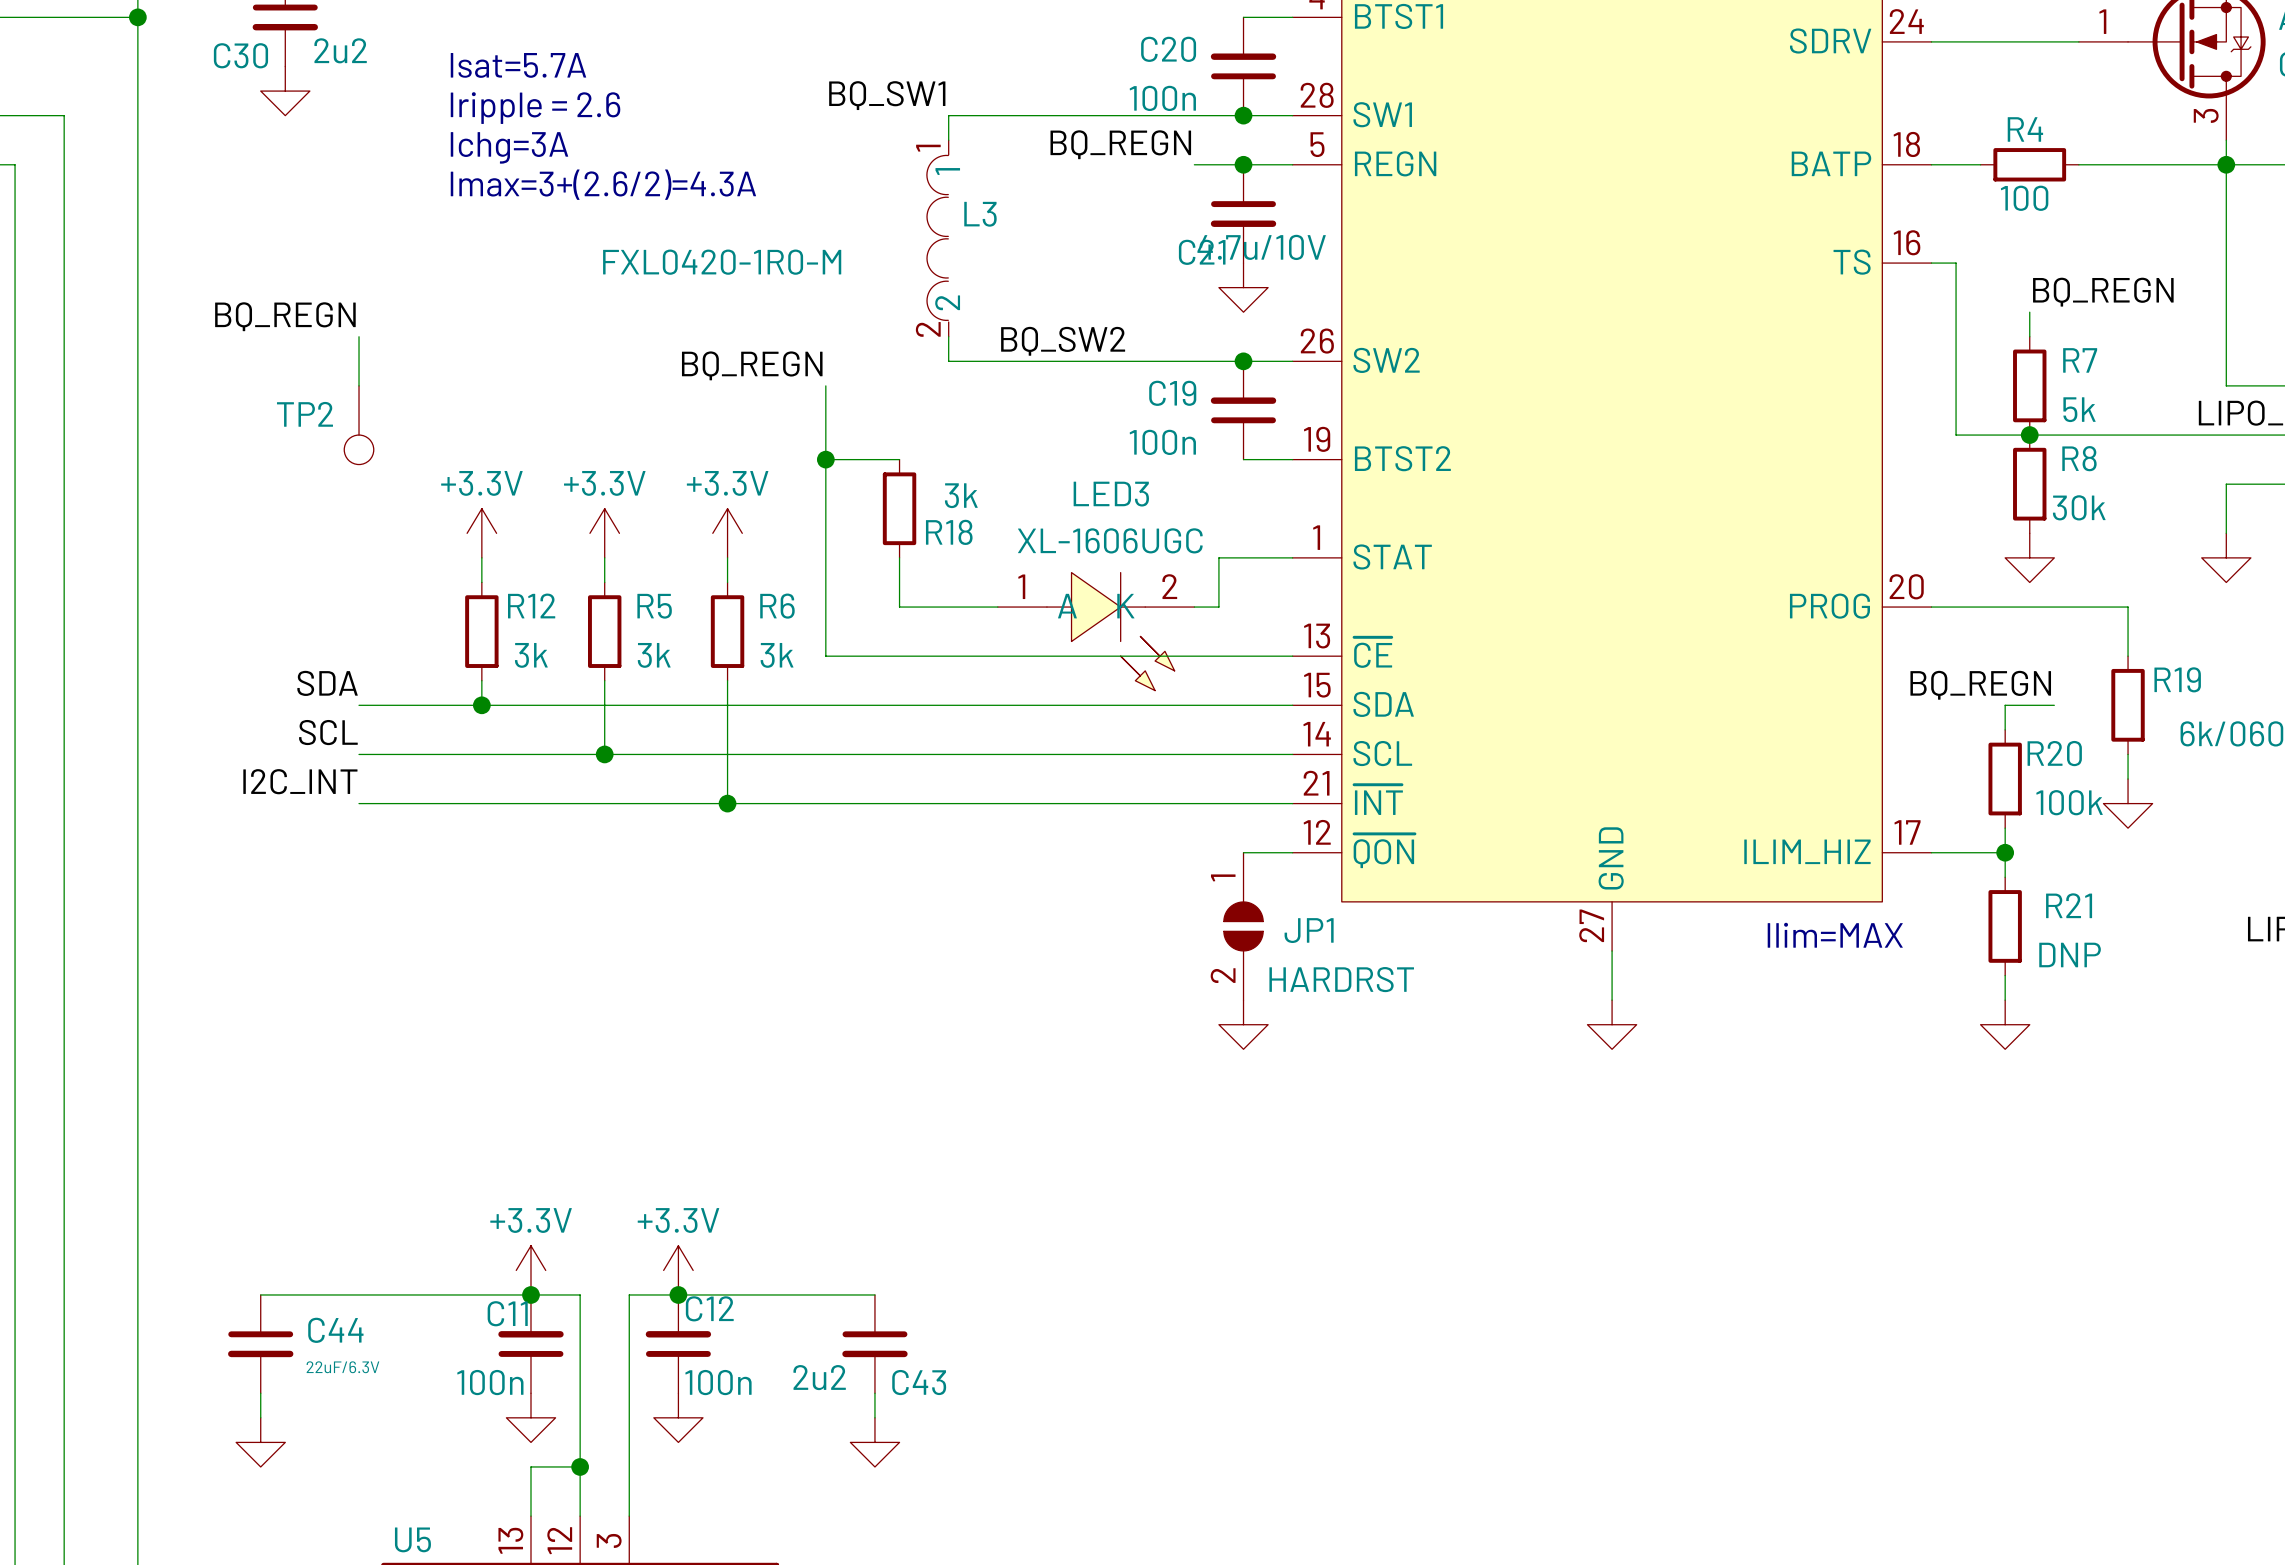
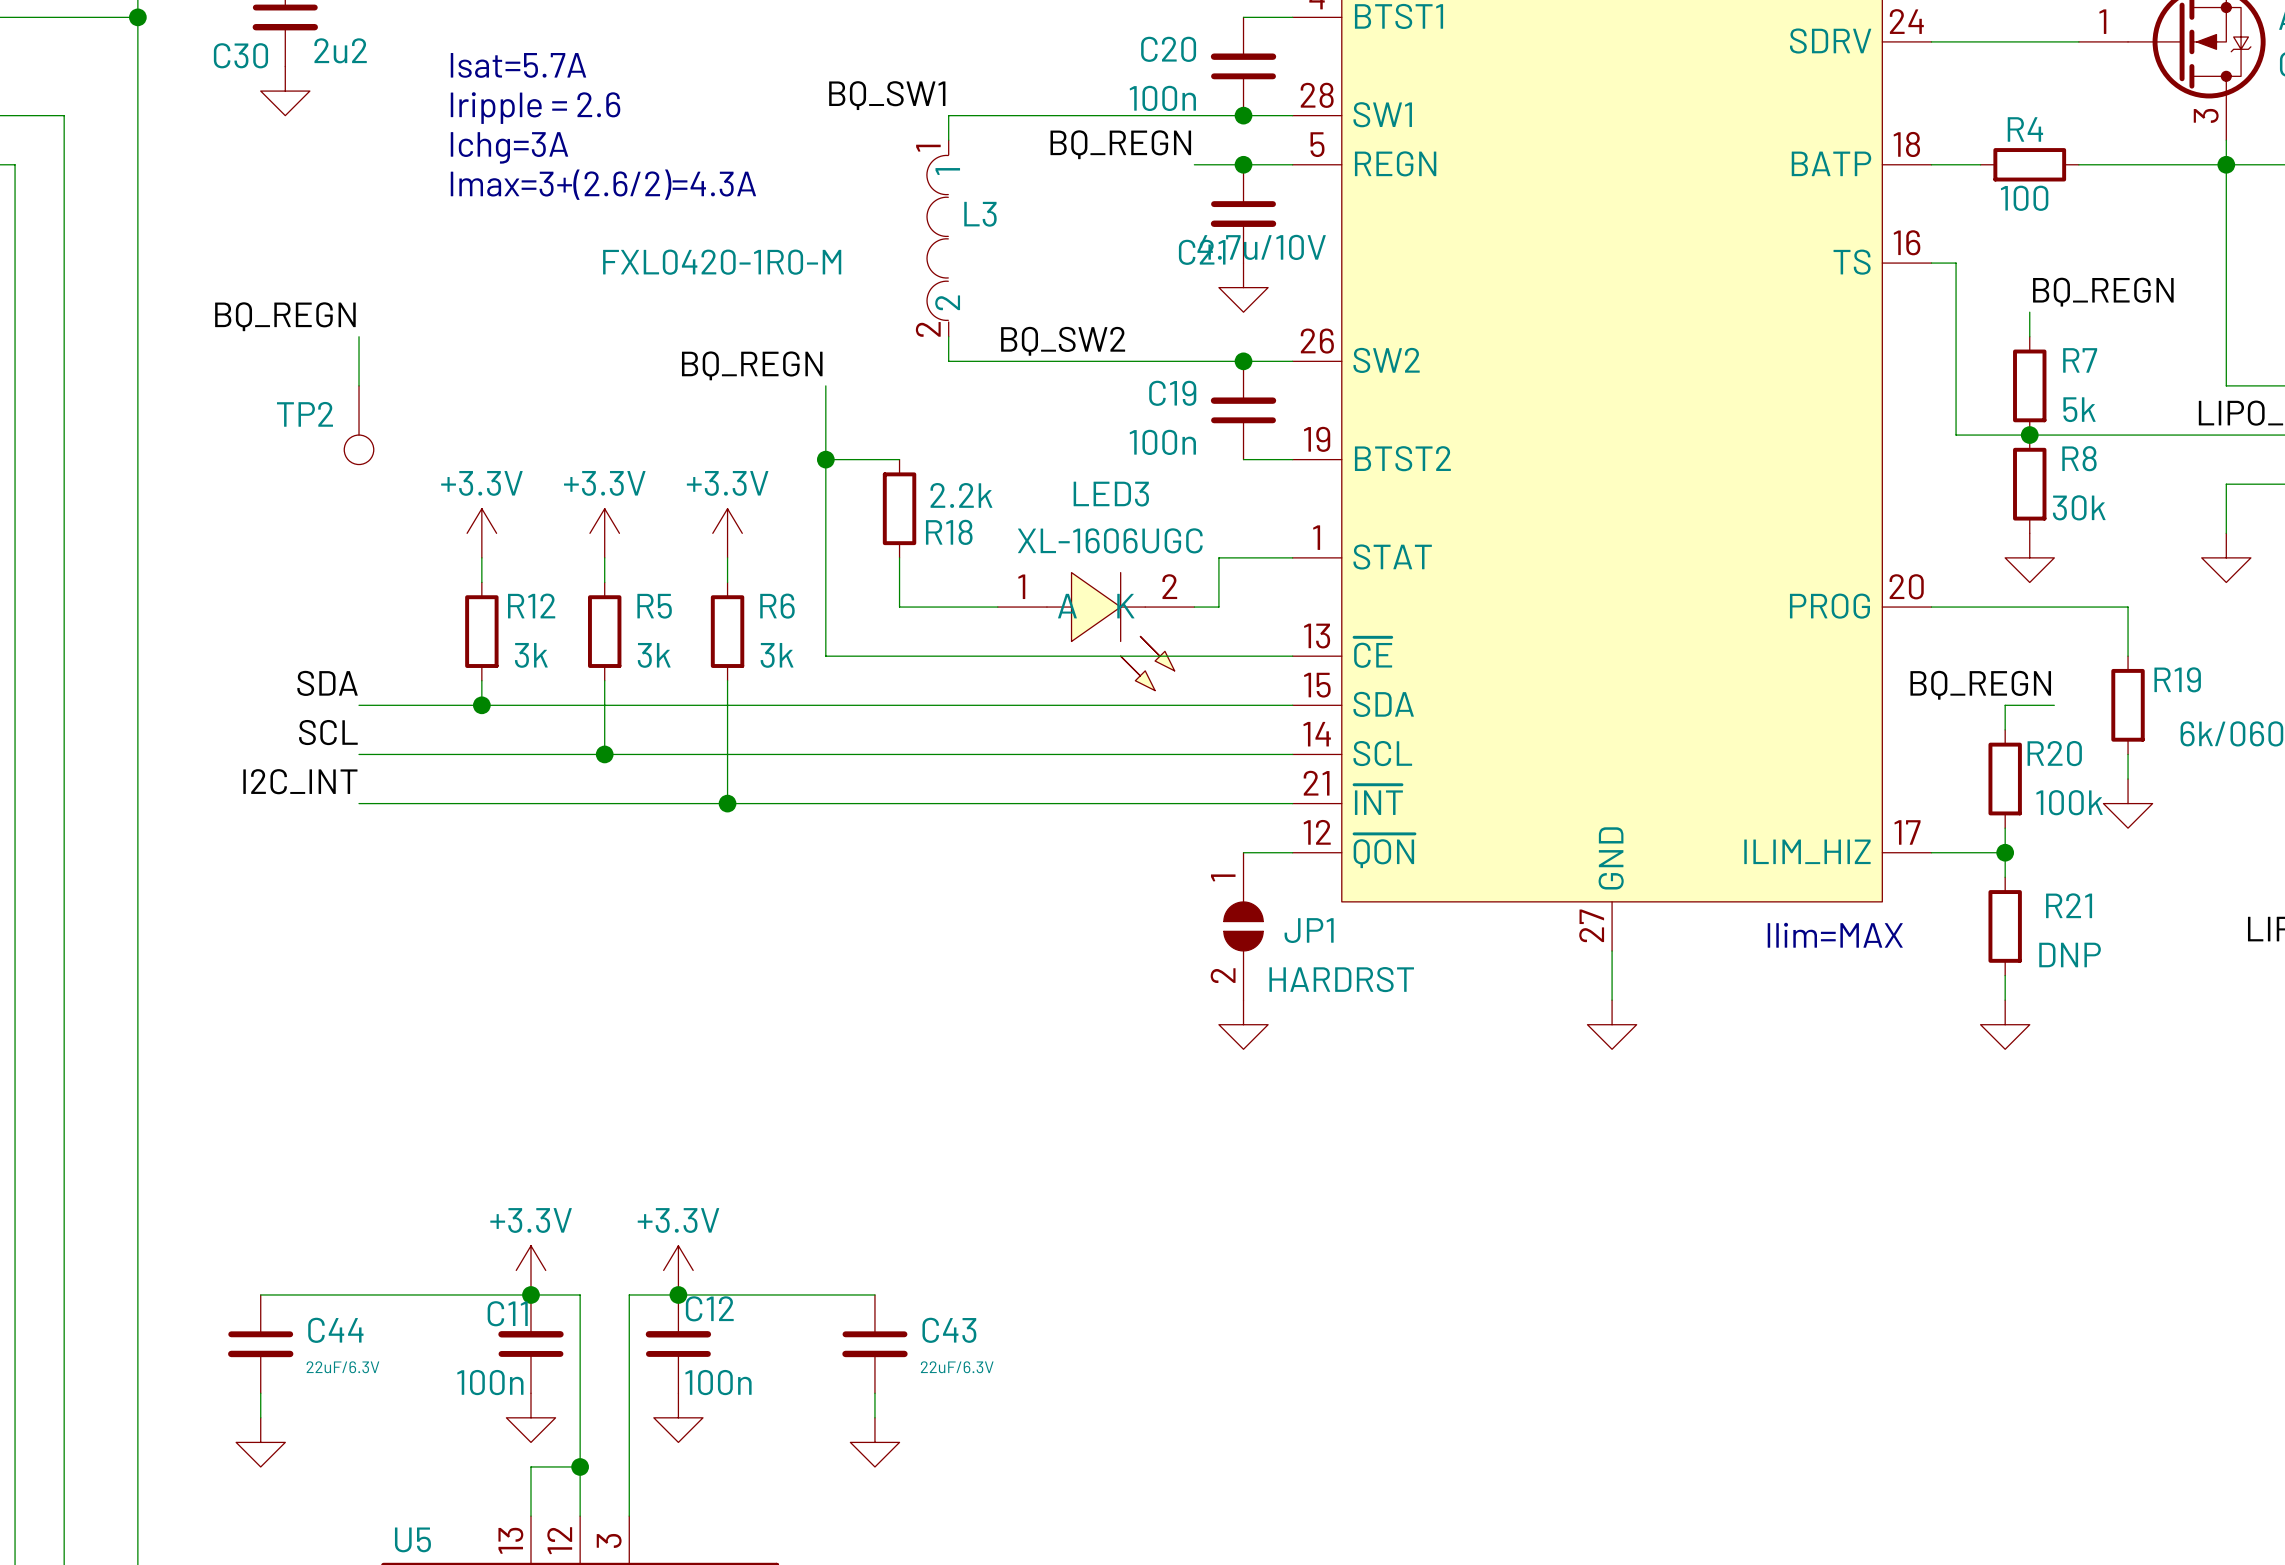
R18 value: 3k (961, 495) -> 2.2k (961, 495)
C43 value: 2u2 (819, 1377) -> 22uF/6.3V (957, 1367)
C43 name position: C43 (919, 1382) -> C43 (949, 1330)

